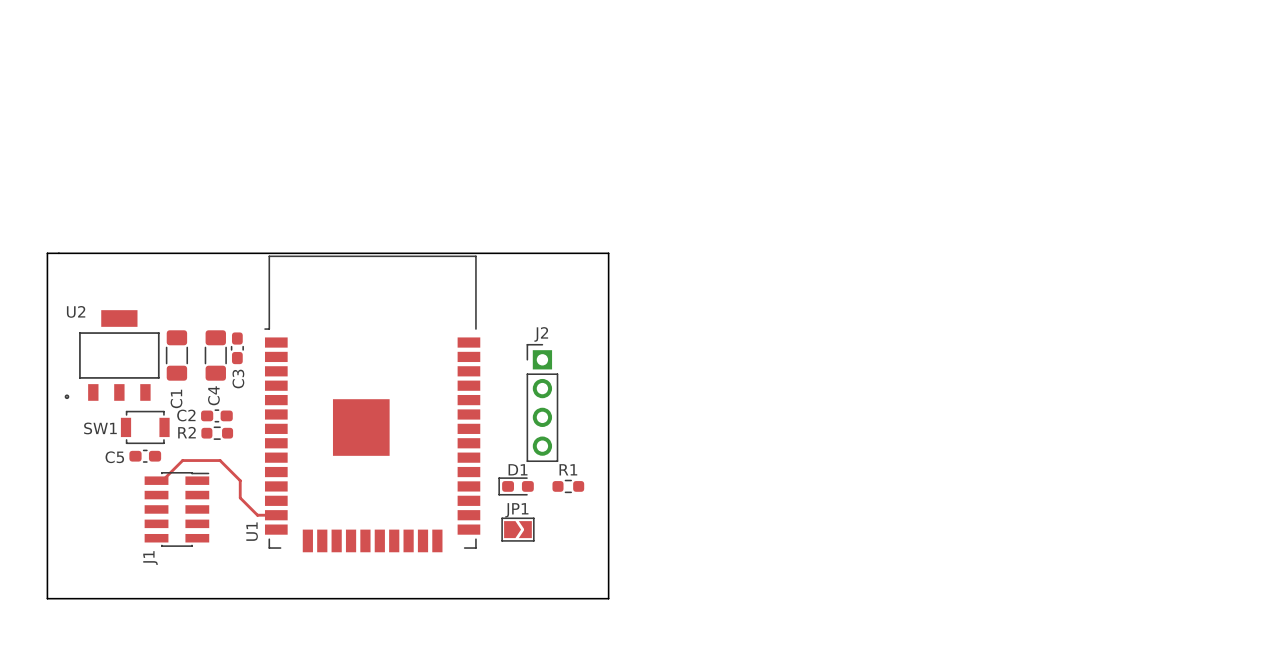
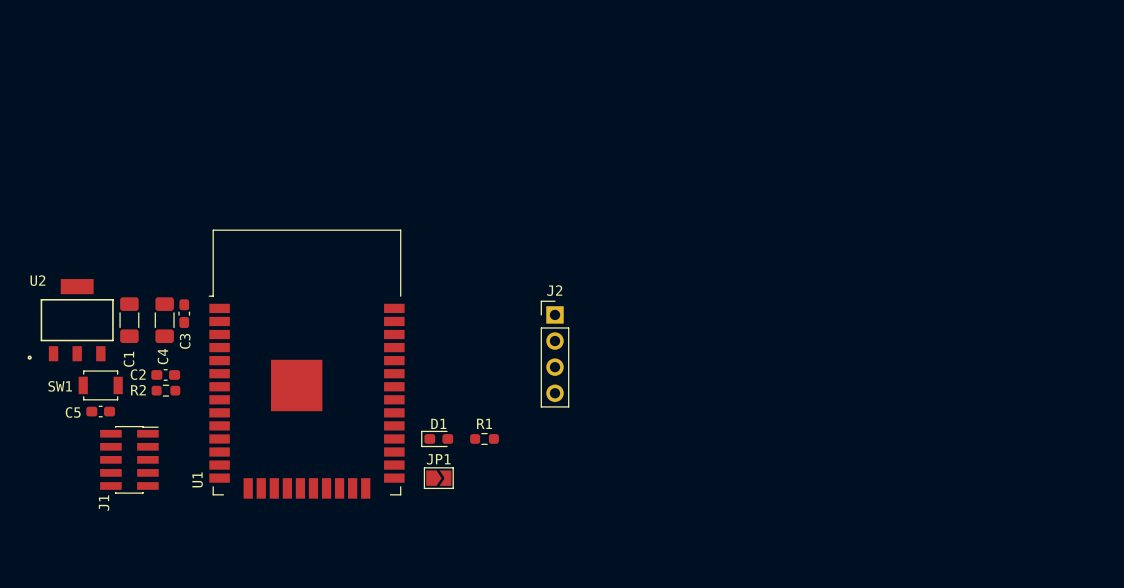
board edge: (47, 253) (608, 253) (608, 598) (47, 598) (47, 253) -> none
J2 position: (542, 402) -> (555, 354)
top track: (156, 480) (162, 480) (182, 460) (220, 460) (240, 480) (240, 497) (257, 515) (276, 515) -> none

